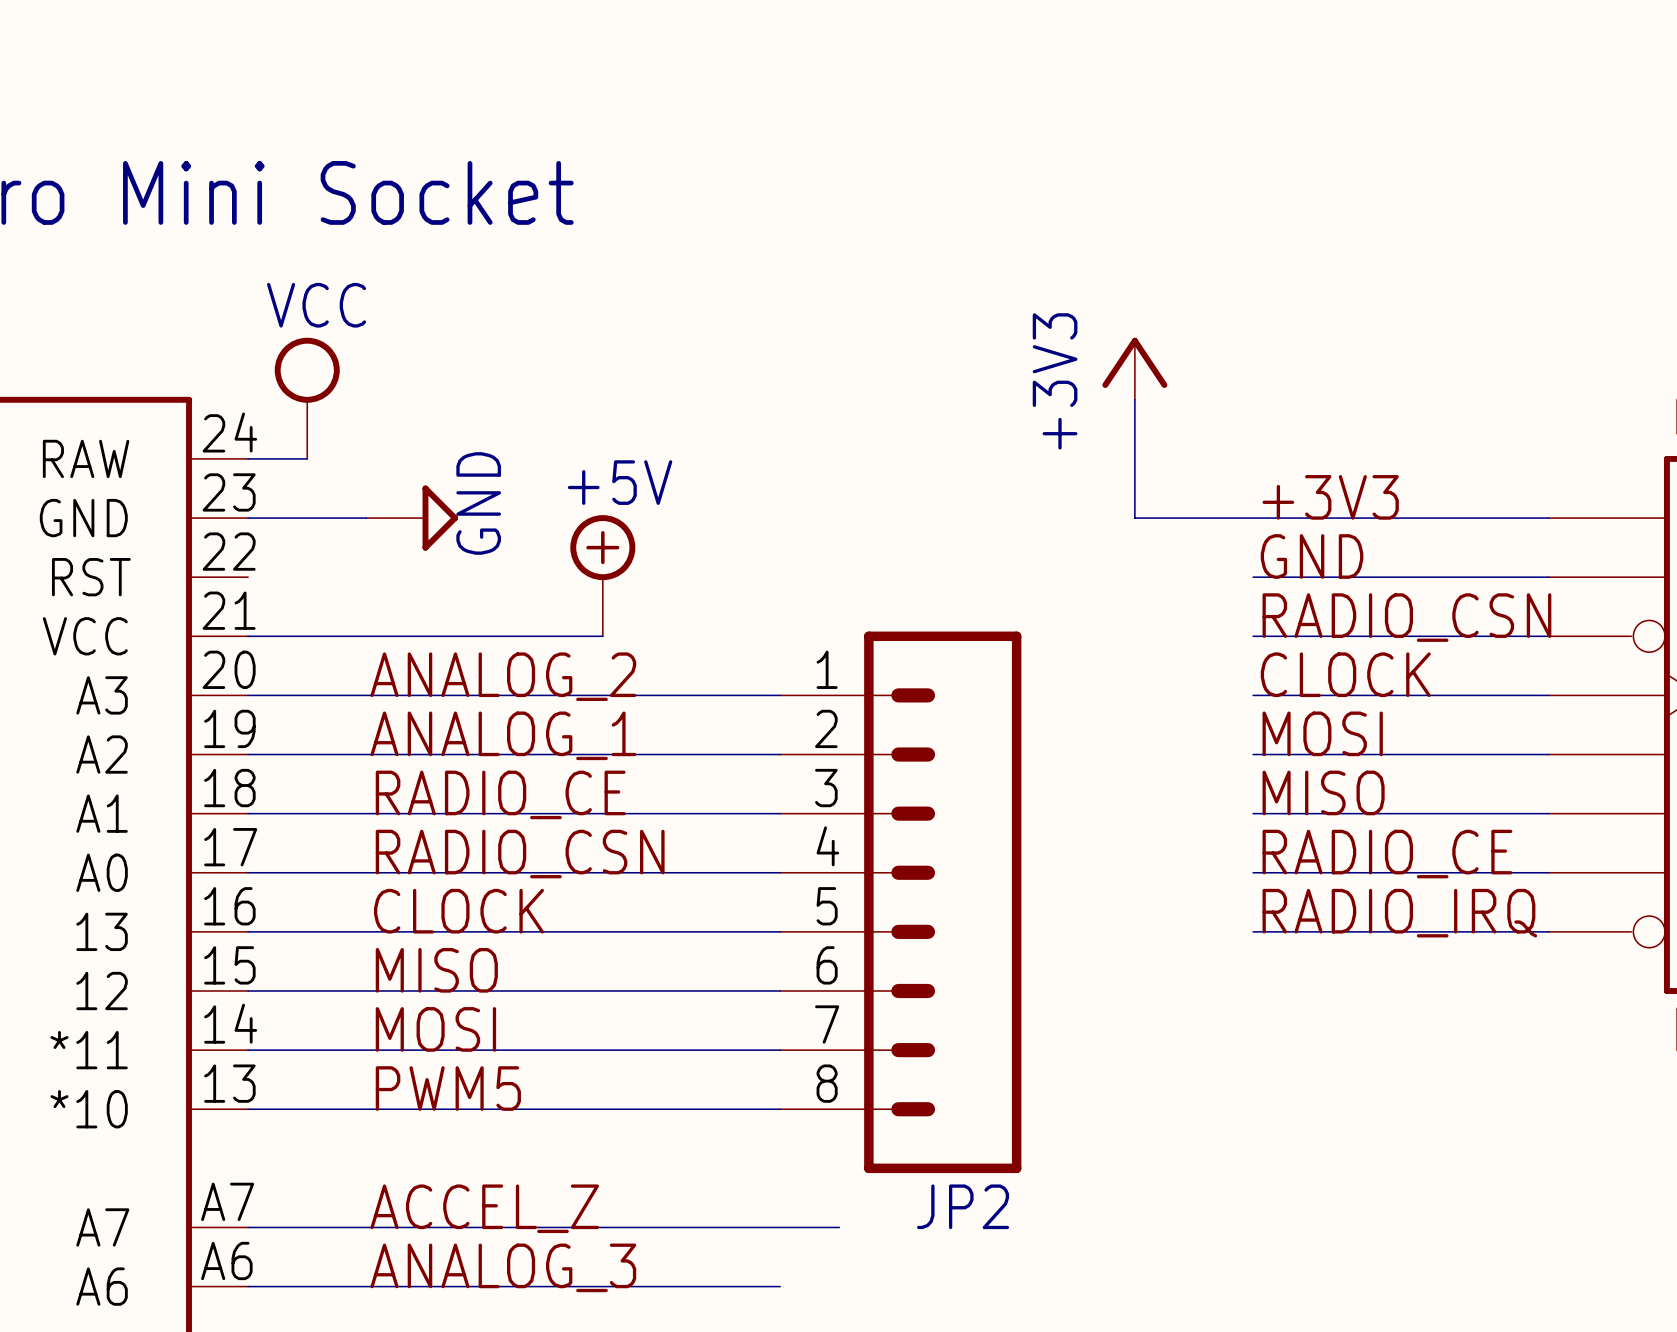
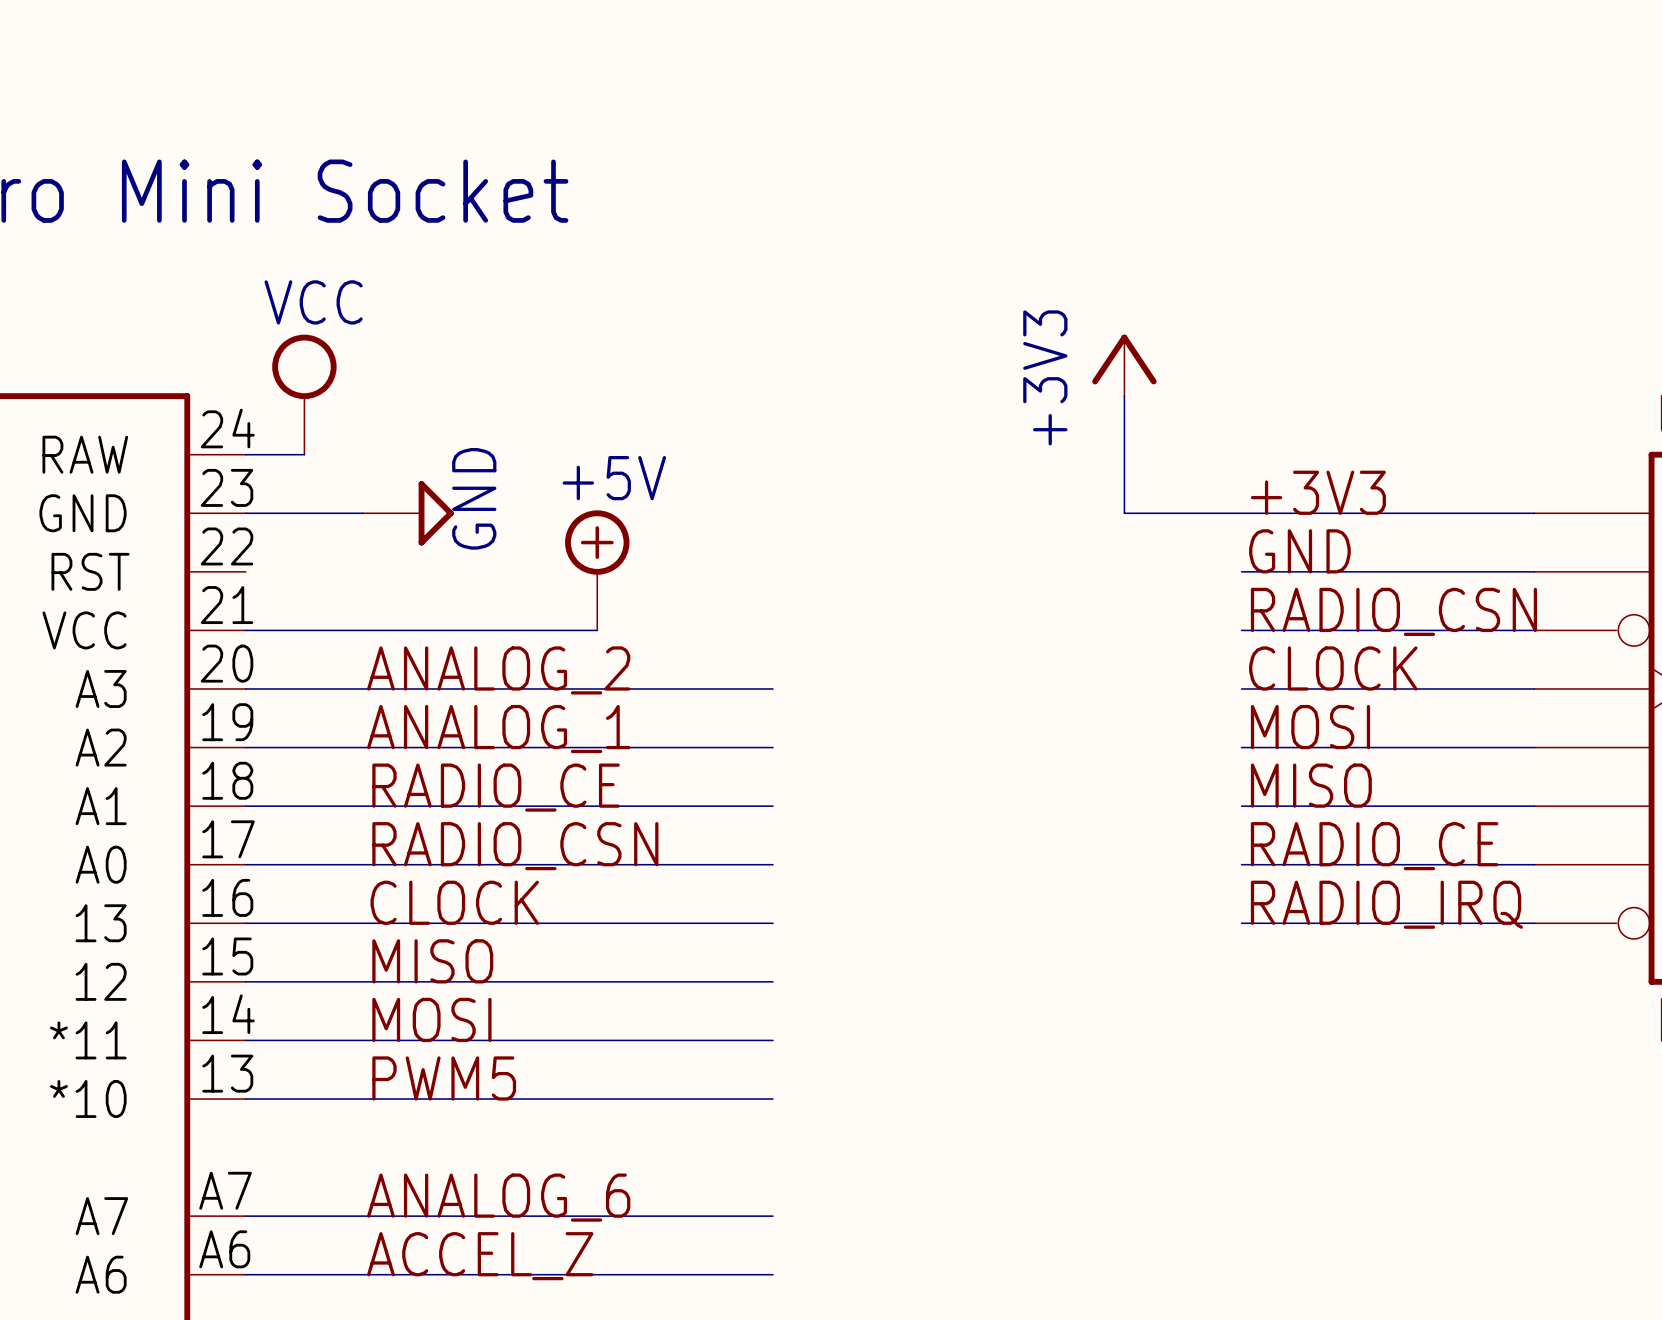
JP2: (900, 902) -> none
label: ACCEL_Z (484, 1208) -> ANALOG_6 (498, 1197)
wire: (780, 1227) (839, 1227) -> none
label: ANALOG_3 (503, 1267) -> ACCEL_Z (480, 1256)

